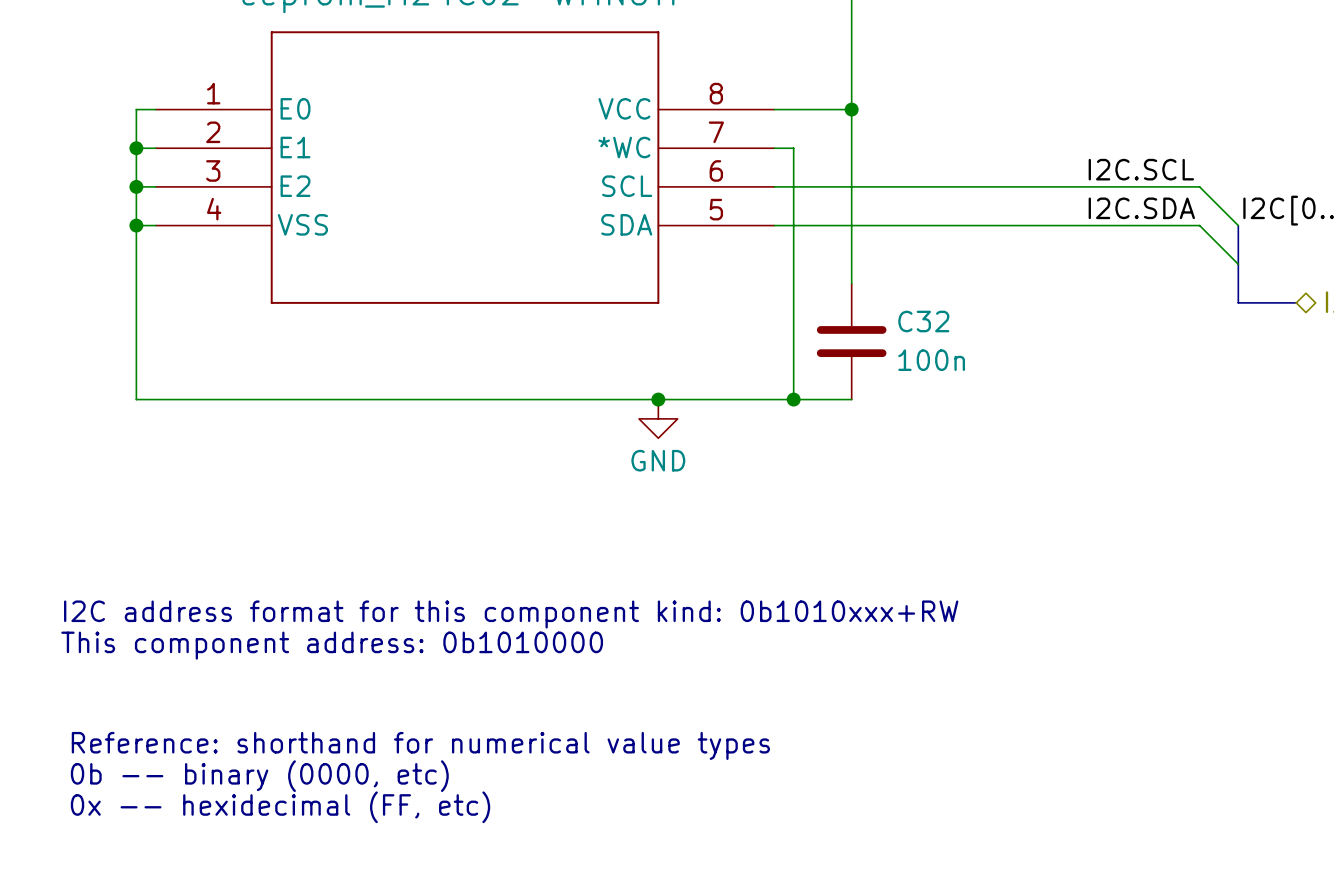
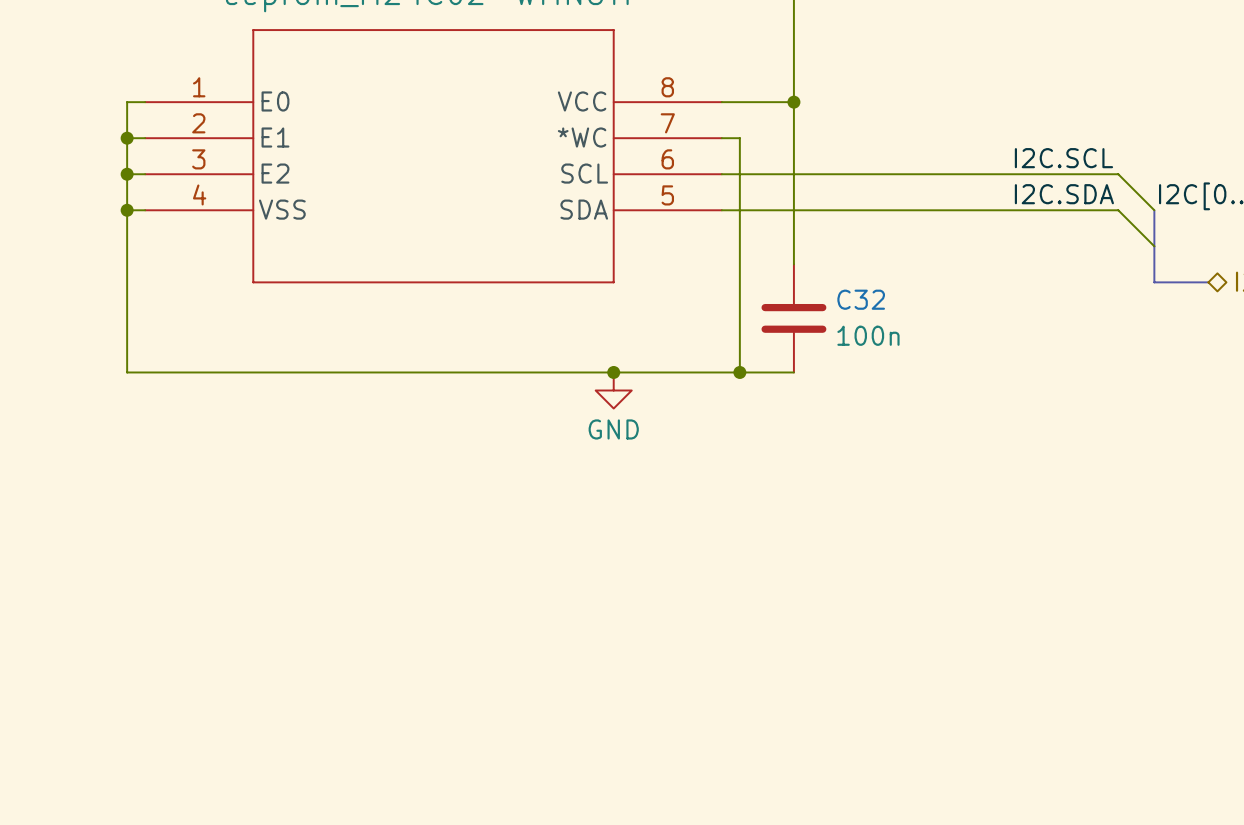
text: I2C address format for this component kind: 0b1010xxx+RW (511, 614) -> none
text: This component address: 0b1010000 (332, 645) -> none
text: Reference: shorthand for numerical value types (420, 745) -> none
text: 0b -- binary (0000, etc) (259, 776) -> none
text: 0x -- hexidecimal (FF, etc) (280, 807) -> none

